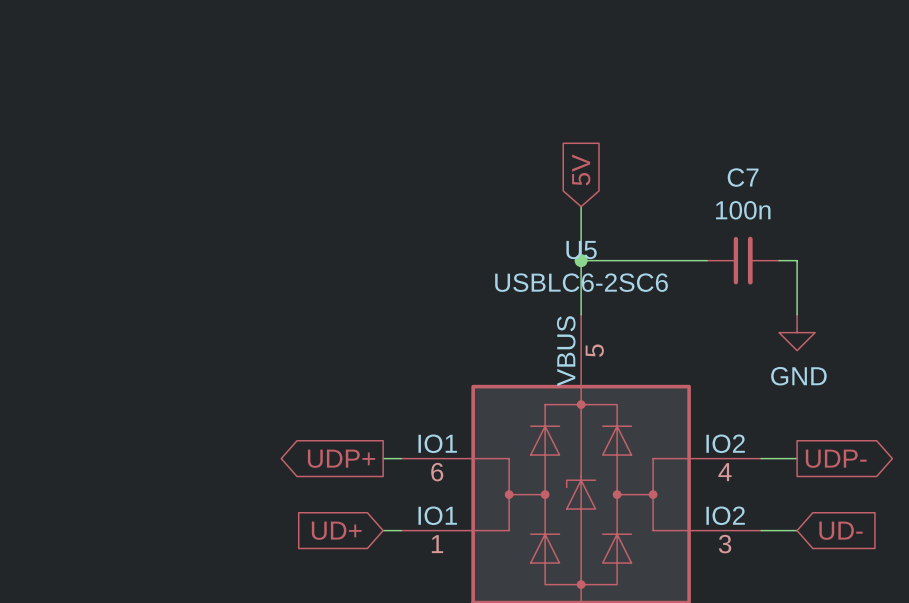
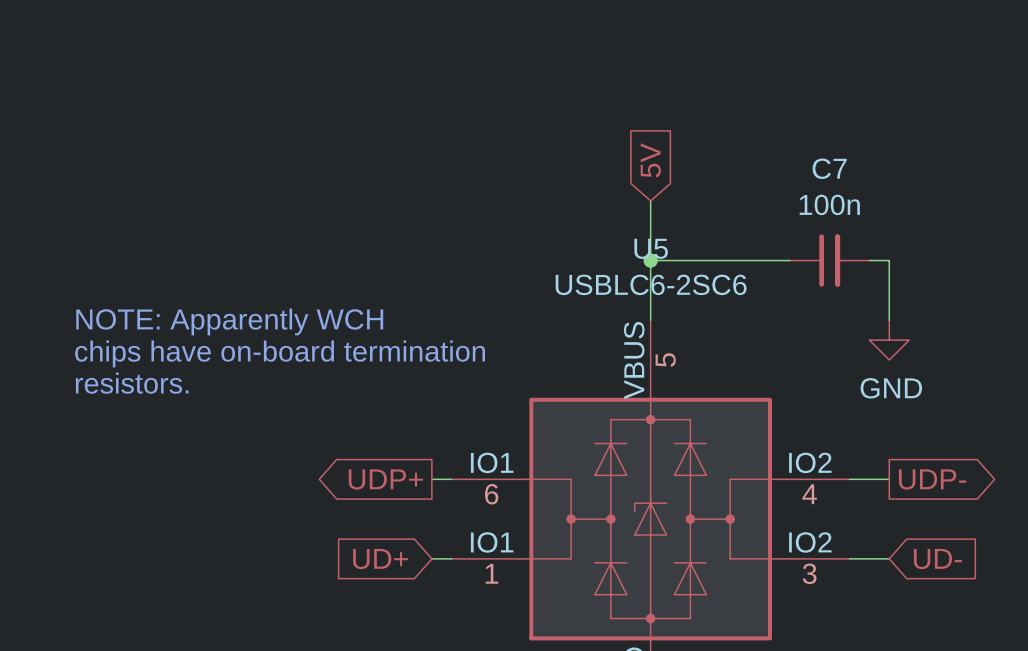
text: none -> NOTE: Apparently WCH (229, 321)
text: none -> chips have on-board termination (280, 353)
text: none -> resistors. (132, 383)

